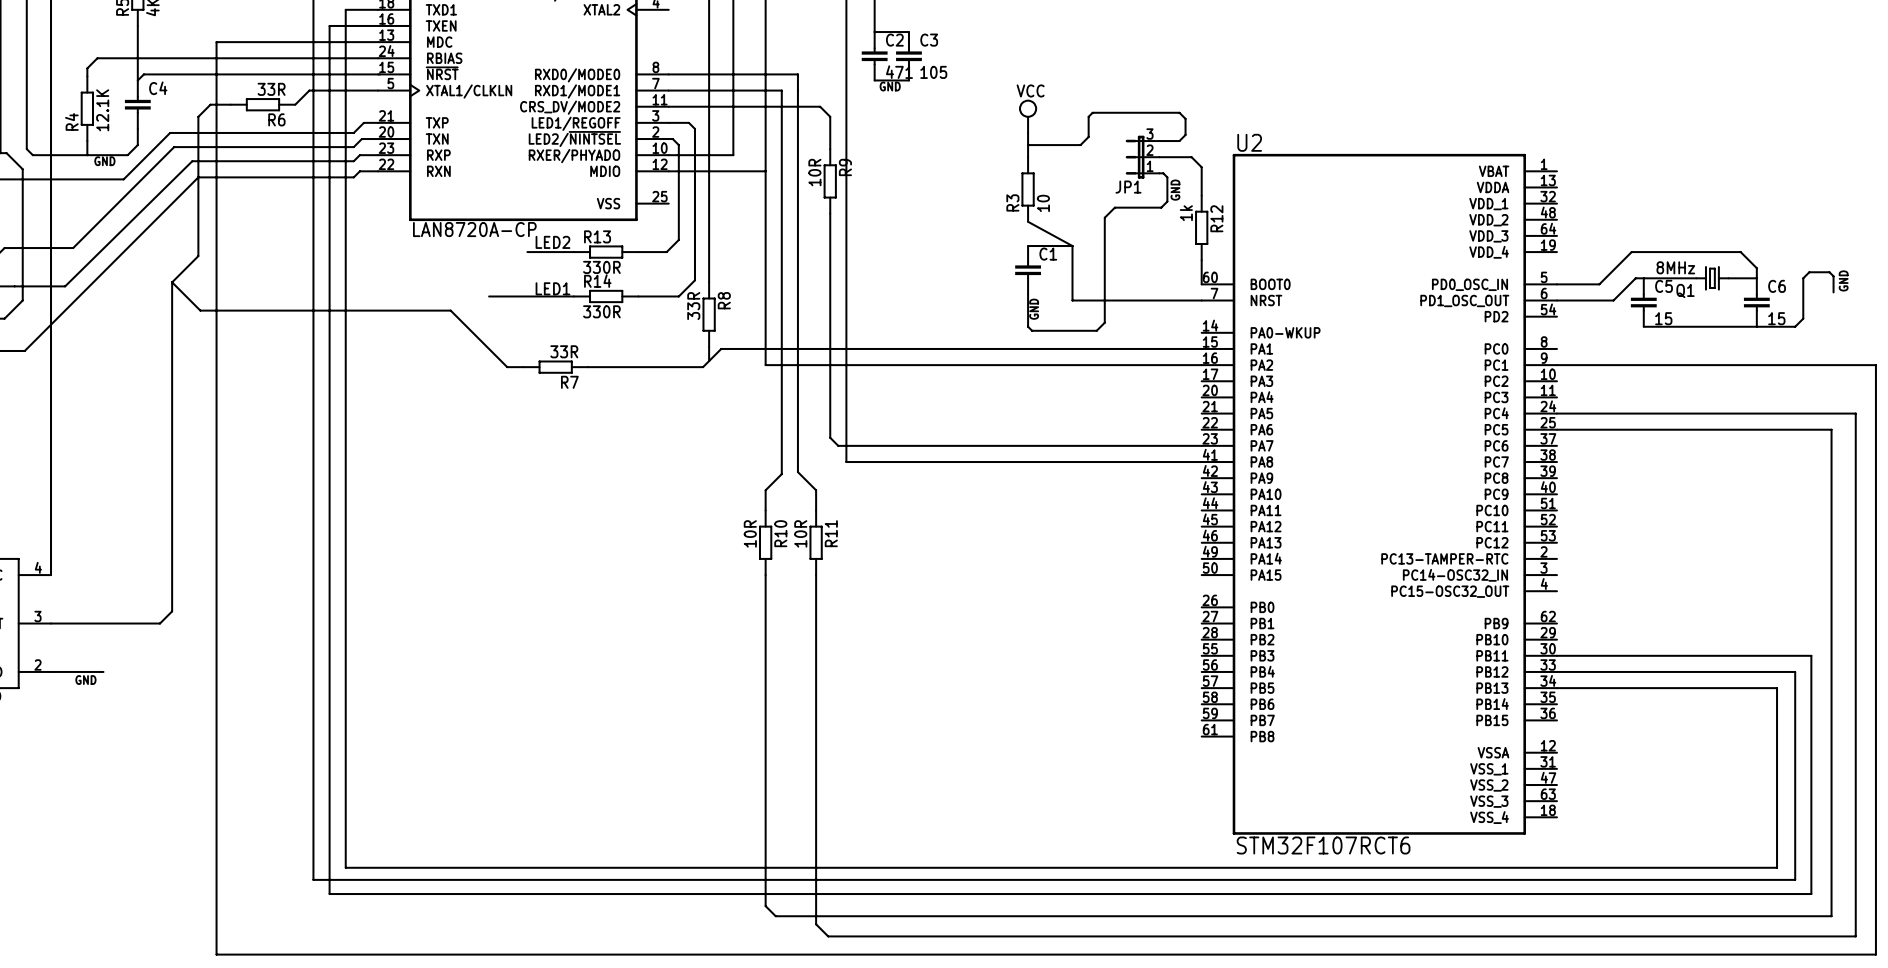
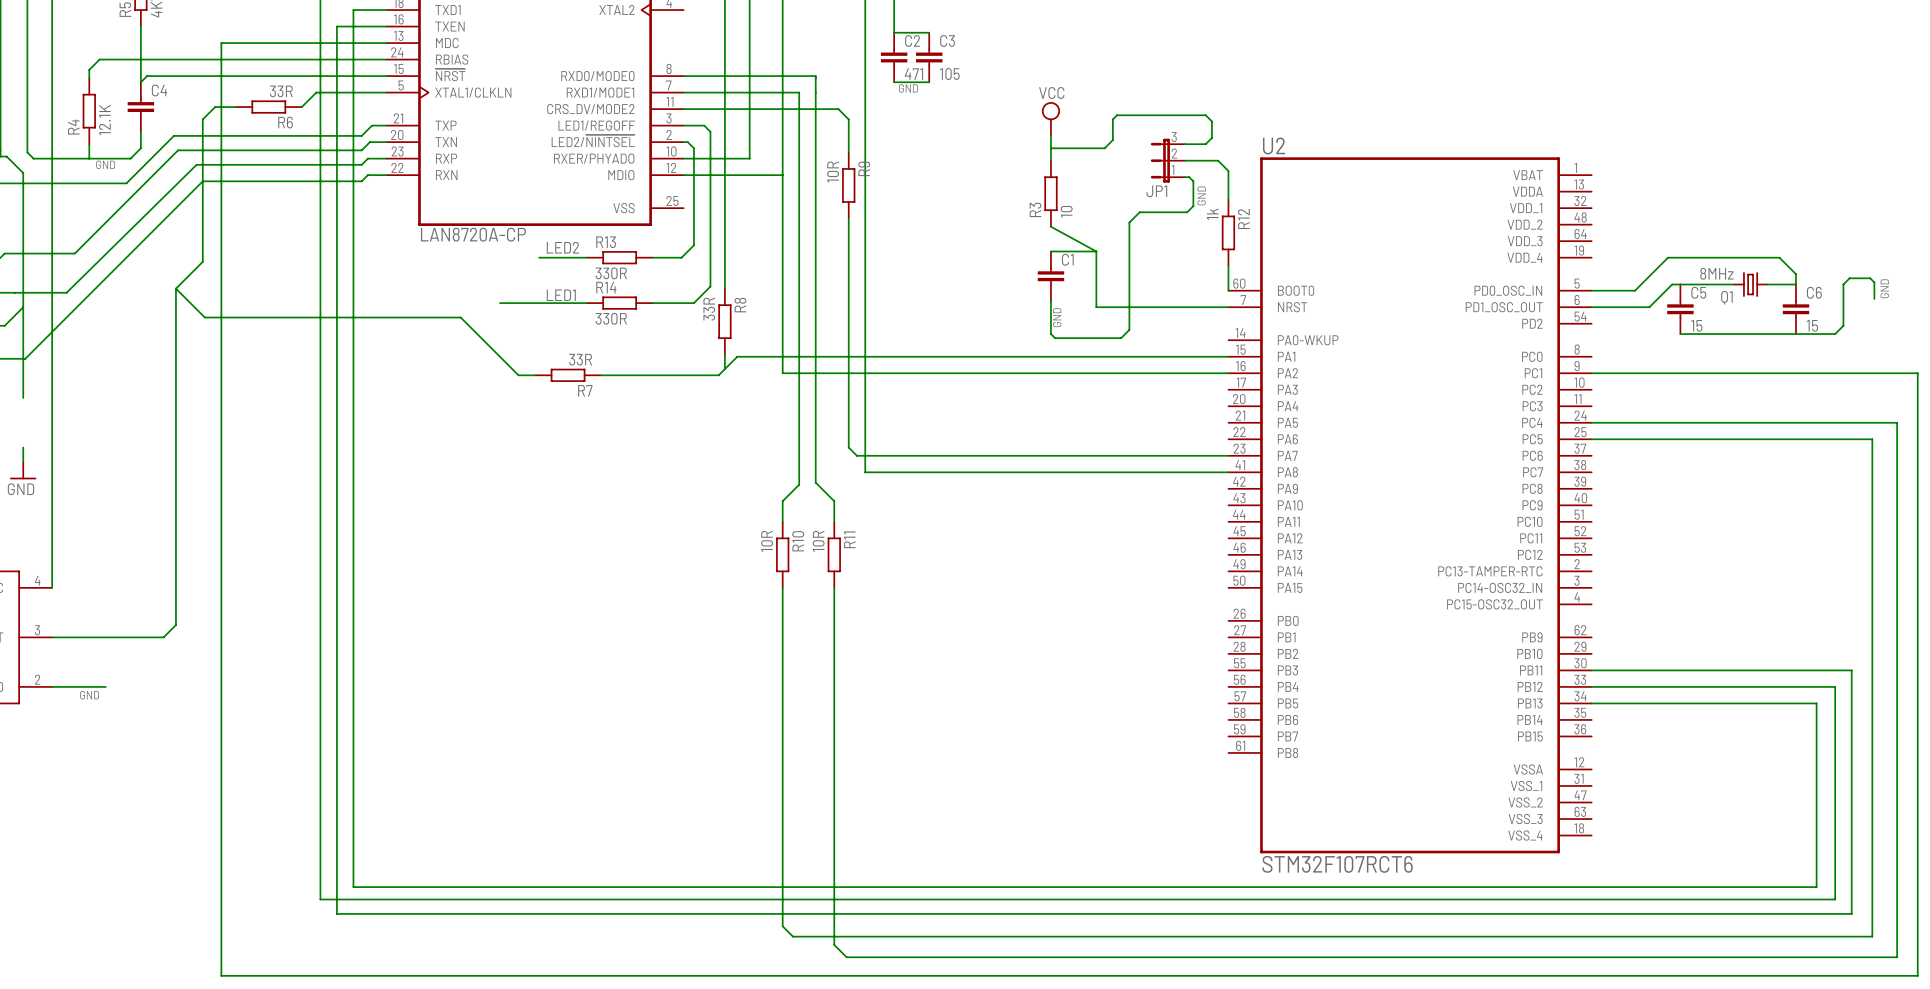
wire: none -> (23, 307) (23, 398)
wire: none -> (23, 447) (23, 461)
power symbol: none -> GND (23, 470)

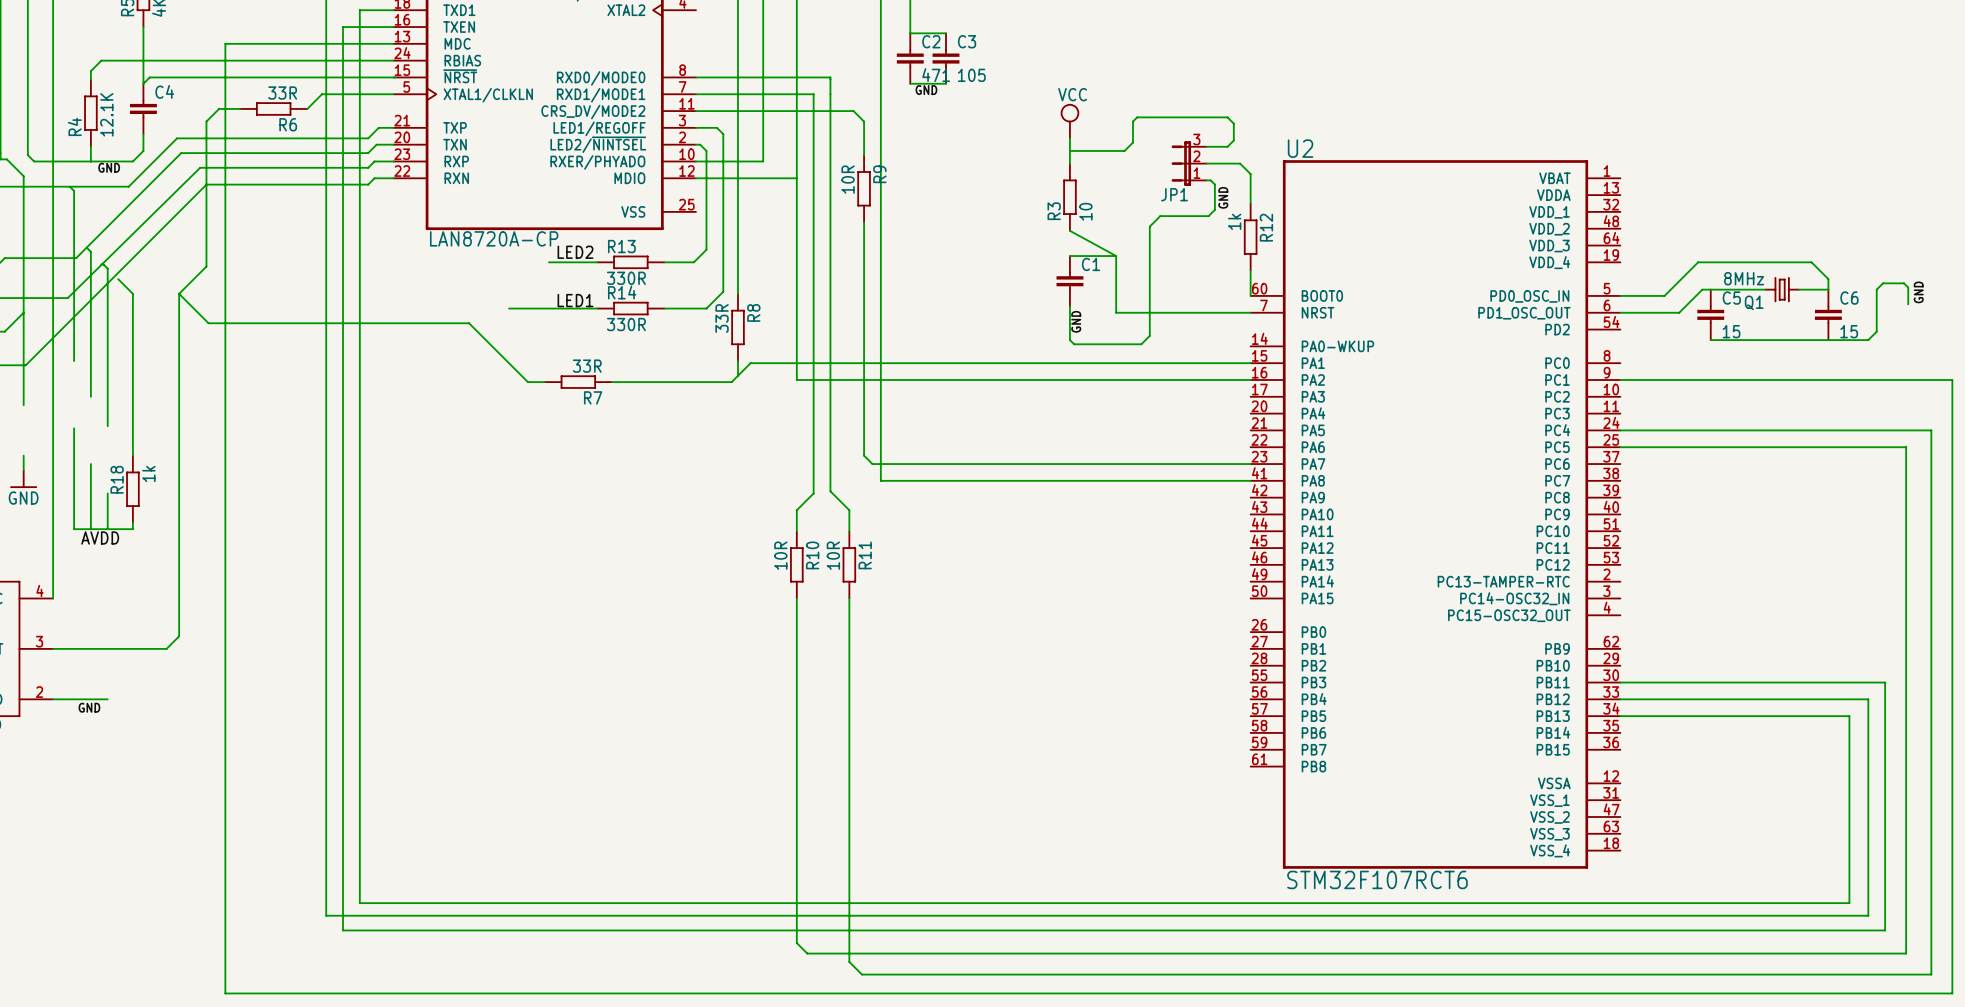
wire: none -> (69, 186) (74, 190) (74, 361)
wire: none -> (86, 247) (90, 251) (90, 396)
wire: none -> (101, 264) (107, 268) (107, 426)
wire: none -> (118, 279) (132, 293) (132, 455)
wire: none -> (74, 428) (74, 529) (132, 529) (132, 522)
wire: none -> (90, 464) (90, 529)
R18: none -> 1k (132, 489)
wire: none -> (107, 493) (107, 529)
label: none -> AVDD (100, 537)

